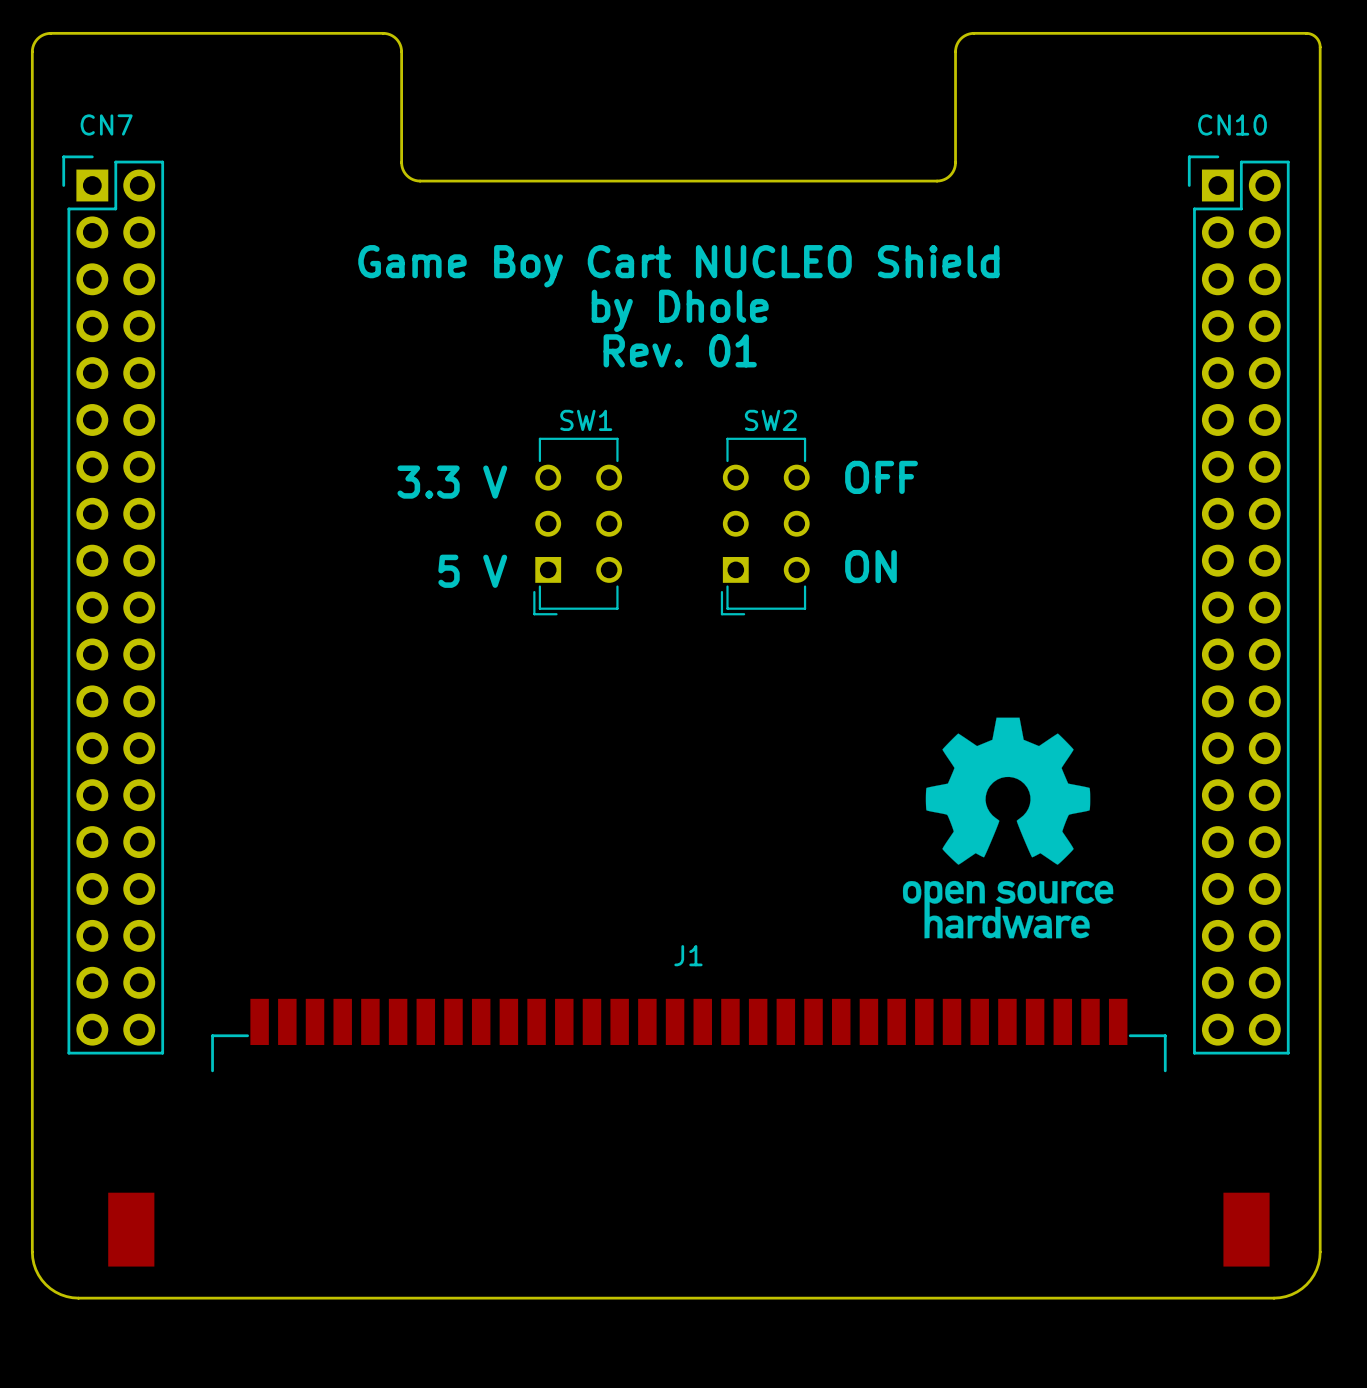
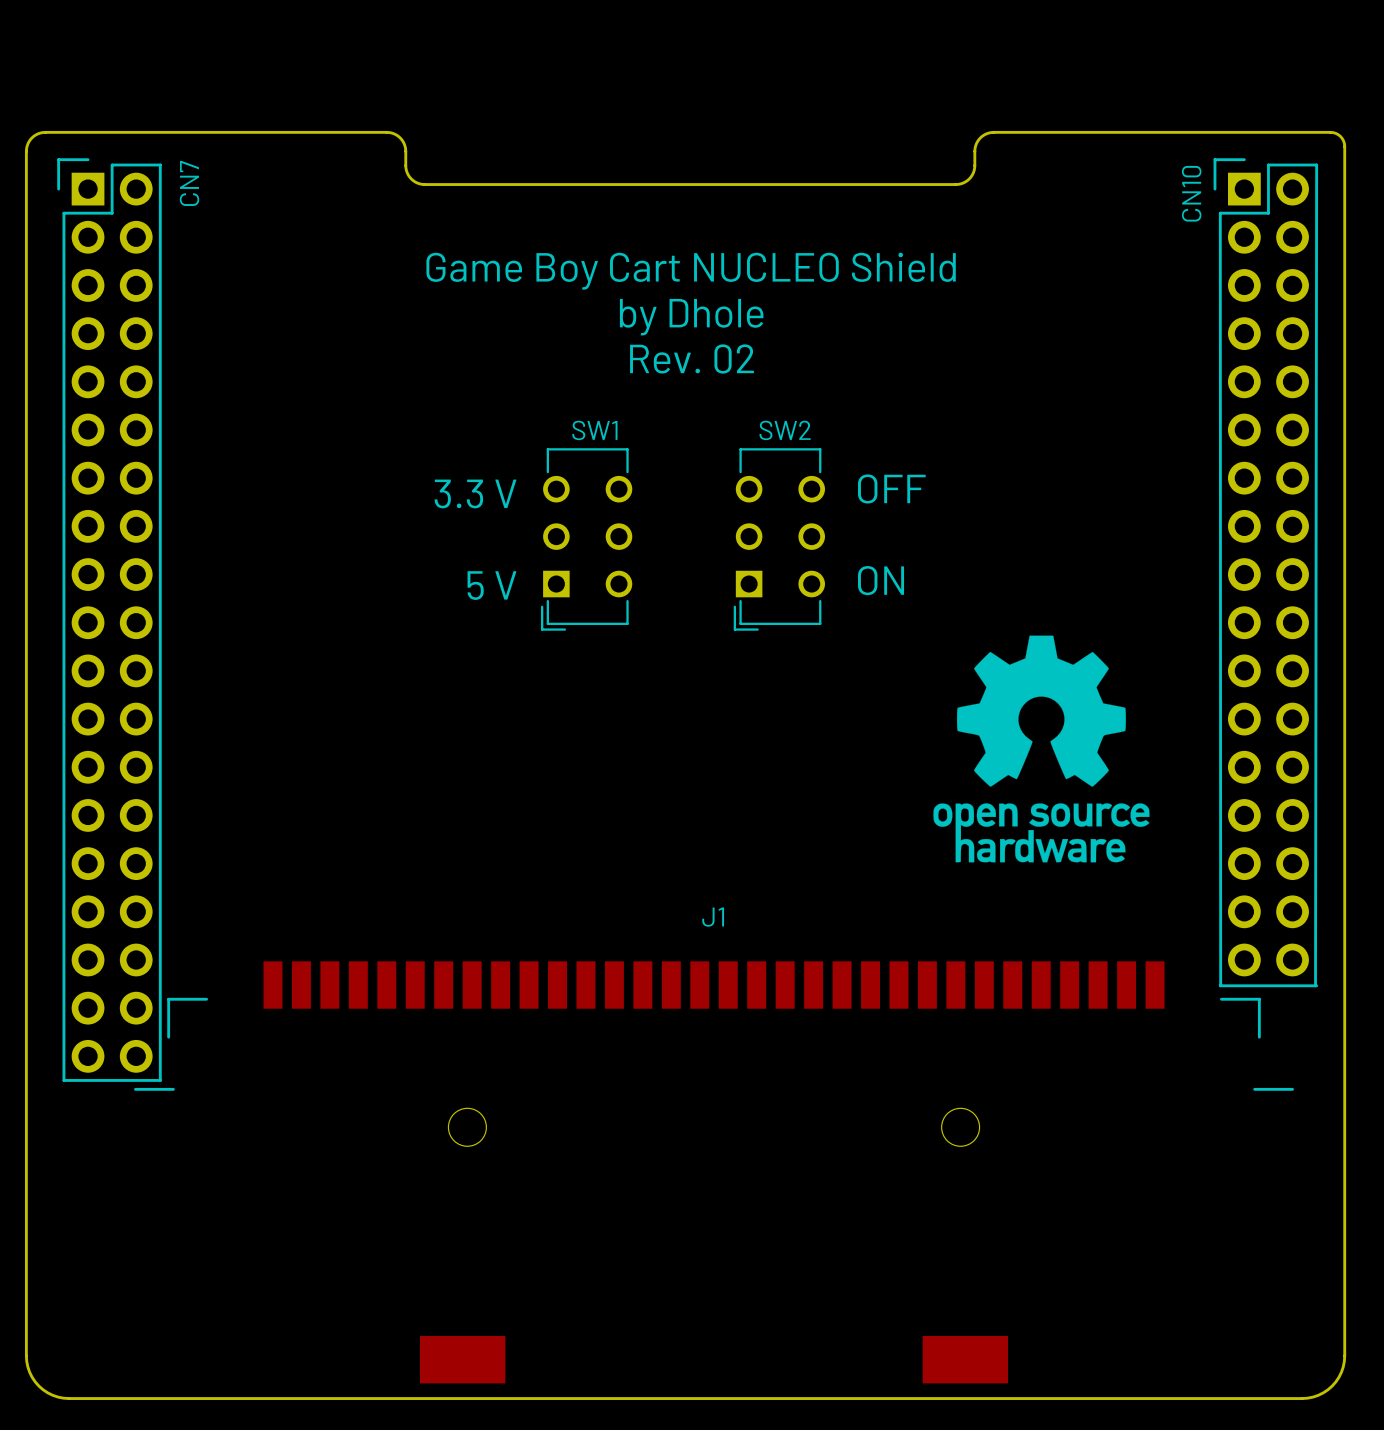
CN7 name rotation: 0° (106, 124) -> 90° counterclockwise (189, 183)
CN7 name position: CN7 (106, 124) -> CN7 (189, 183)
CN10 name position: CN10 (1232, 124) -> CN10 (1191, 193)
board edge: (32, 148) (32, 49) (37, 38) (50, 33) (387, 33) (397, 40) (401, 49) (401, 148) -> (26, 151) (31, 137) (45, 132) (386, 132) (400, 137) (405, 151)
board edge: (955, 148) (955, 49) (959, 40) (969, 33) (1306, 33) (1314, 36) (1319, 43) (1320, 1251) (1318, 1263) (1310, 1280) (1297, 1291) (1285, 1296) (1274, 1298) (78, 1298) (60, 1294) (45, 1284) (35, 1269) (32, 1251) -> (974, 151) (980, 137) (993, 132) (1330, 132) (1339, 135) (1344, 142) (1344, 1355) (1341, 1372) (1335, 1381) (1318, 1395) (1302, 1398) (63, 1398) (52, 1395) (38, 1386) (27, 1366) (26, 1284)
CN10 footprint: [1187, 155, 1290, 1055] -> [1213, 158, 1319, 988]
text: Rev. 01 (680, 350) -> Rev. 02 (692, 358)
drawing position: (1008, 827) -> (1041, 749)
J1 name position: J1 (688, 955) -> J1 (713, 917)
J1 footprint: [108, 998, 1270, 1267] -> [134, 961, 1294, 1384]

